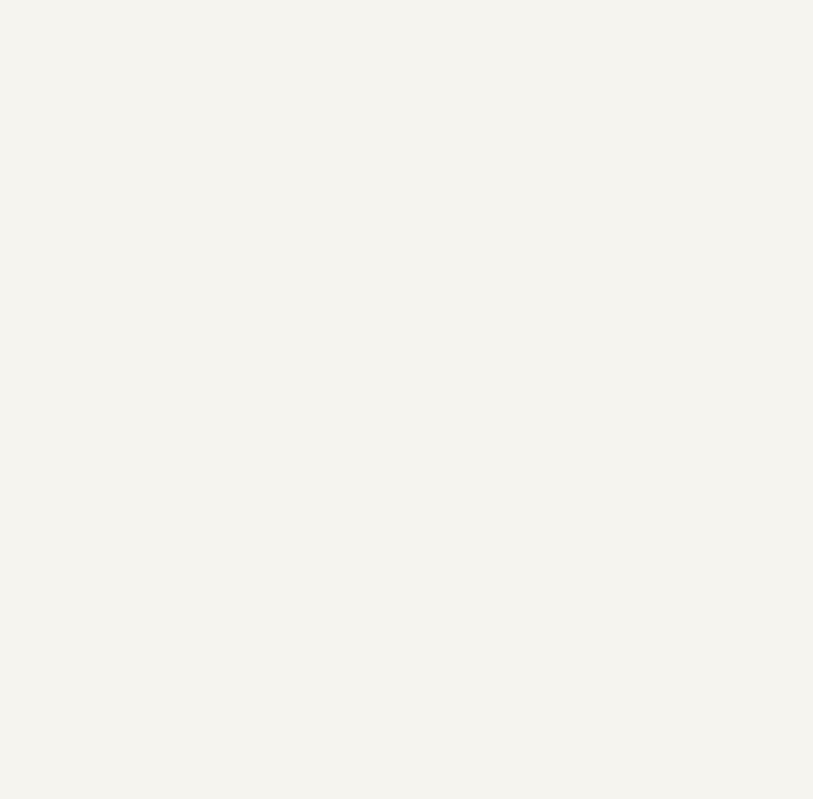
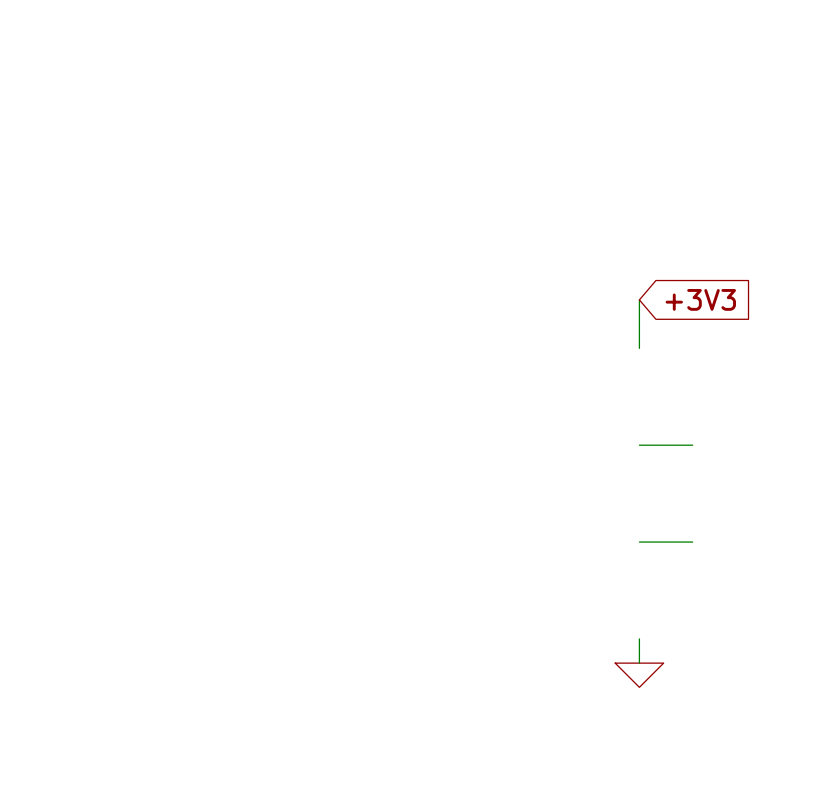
wire: none -> (639, 299) (639, 348)
global label: none -> +3V3 (700, 299)
wire: none -> (639, 445) (692, 445)
wire: none -> (639, 542) (692, 542)
wire: none -> (639, 638) (639, 663)
power symbol: none -> (639, 675)

